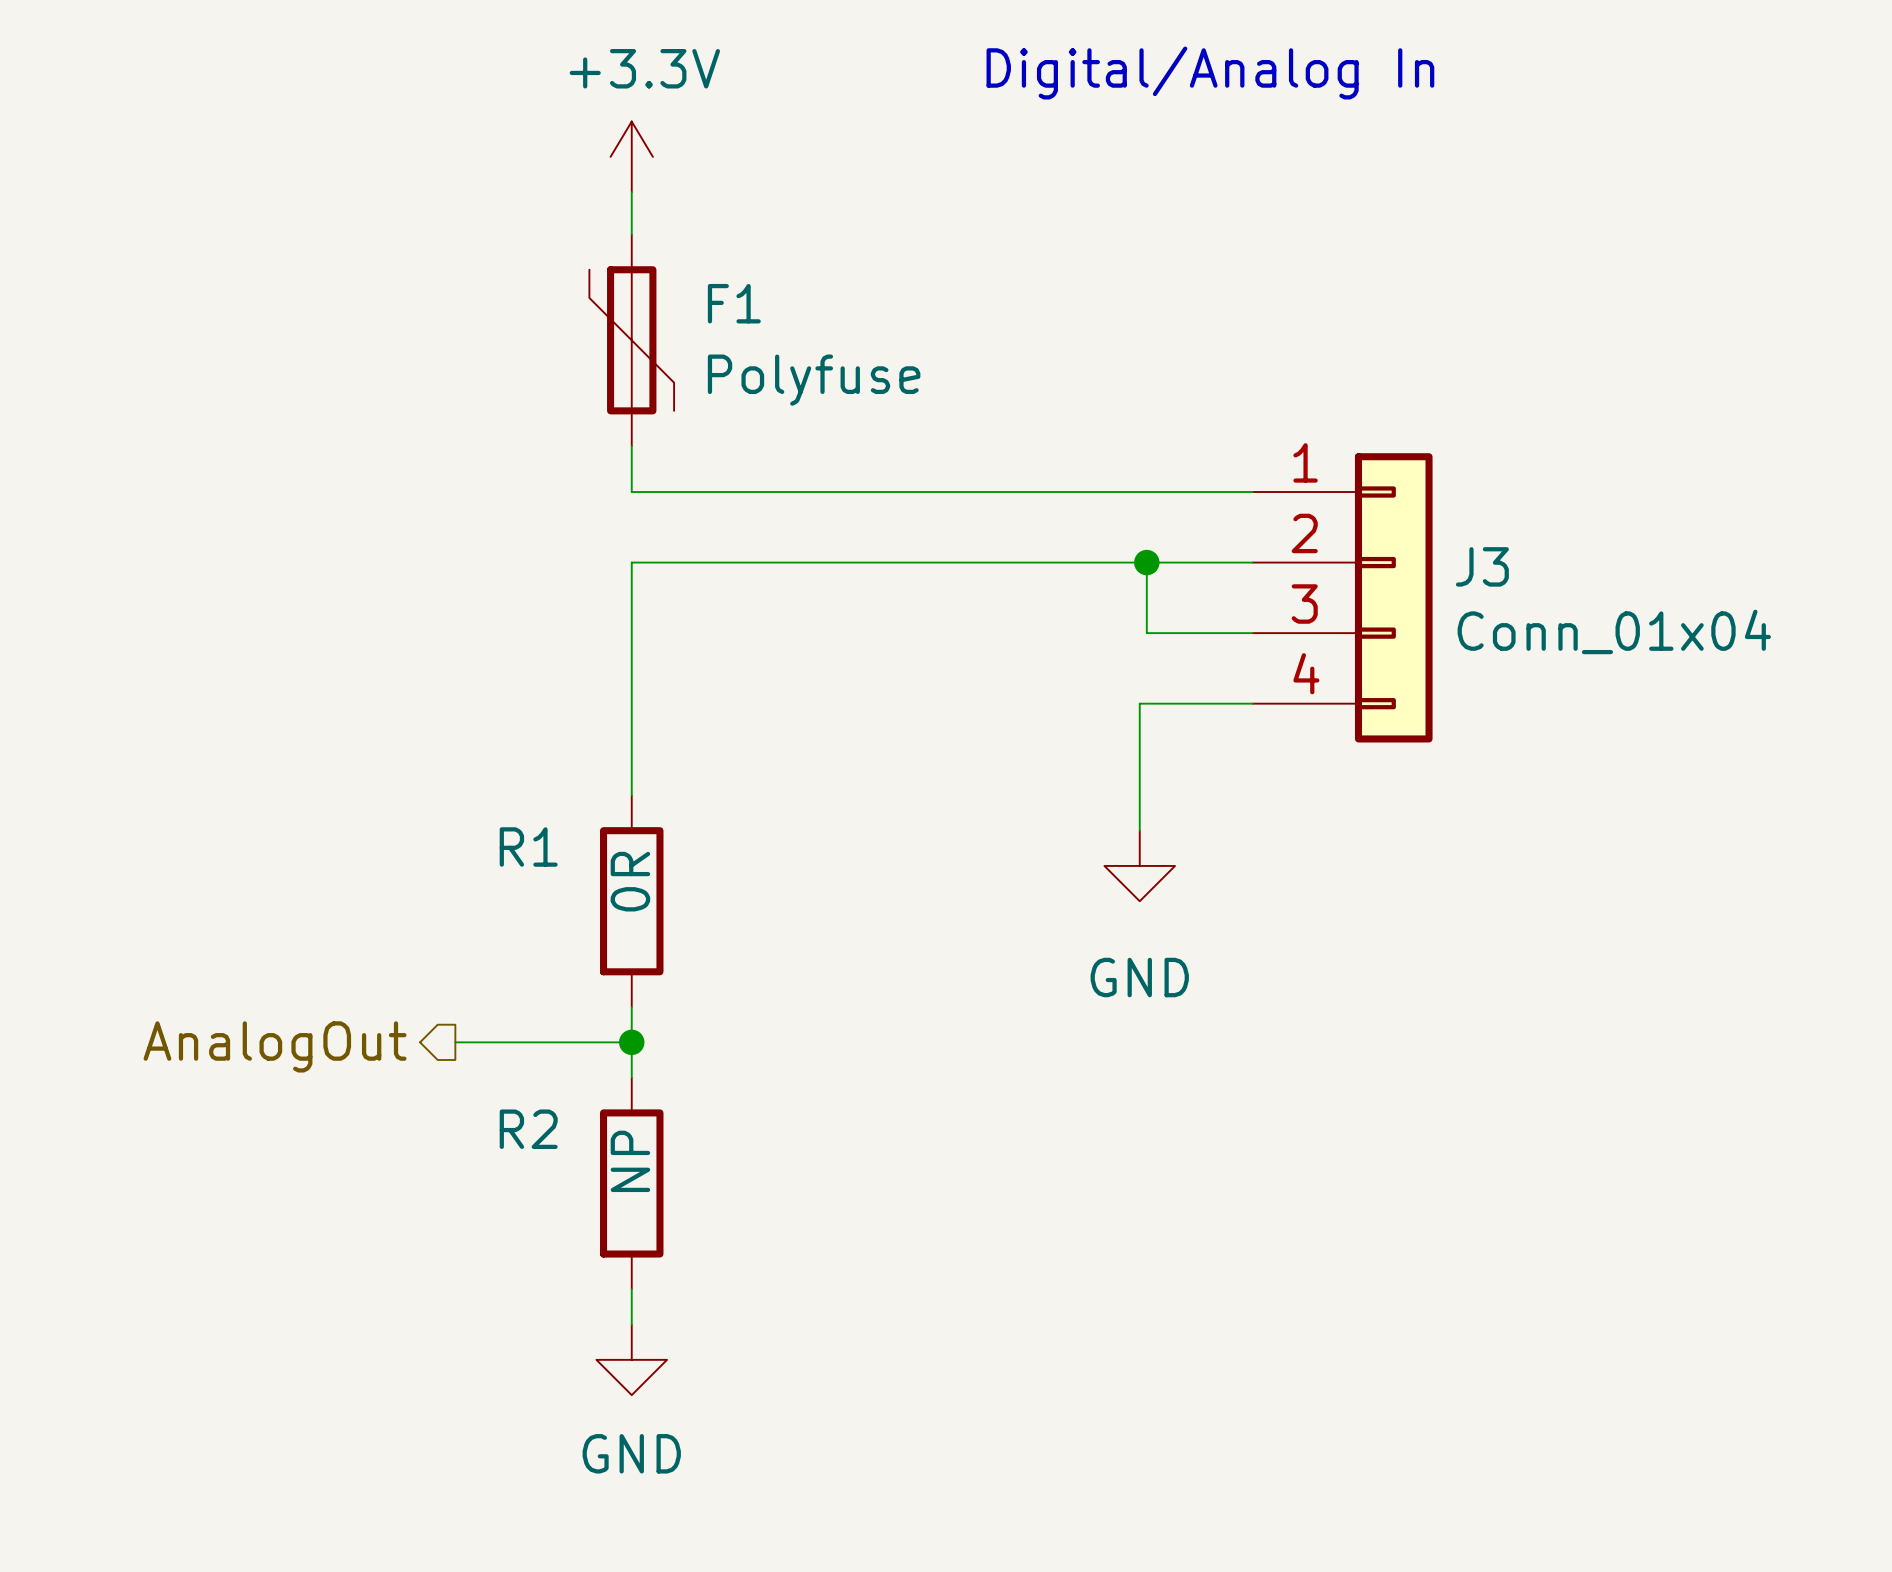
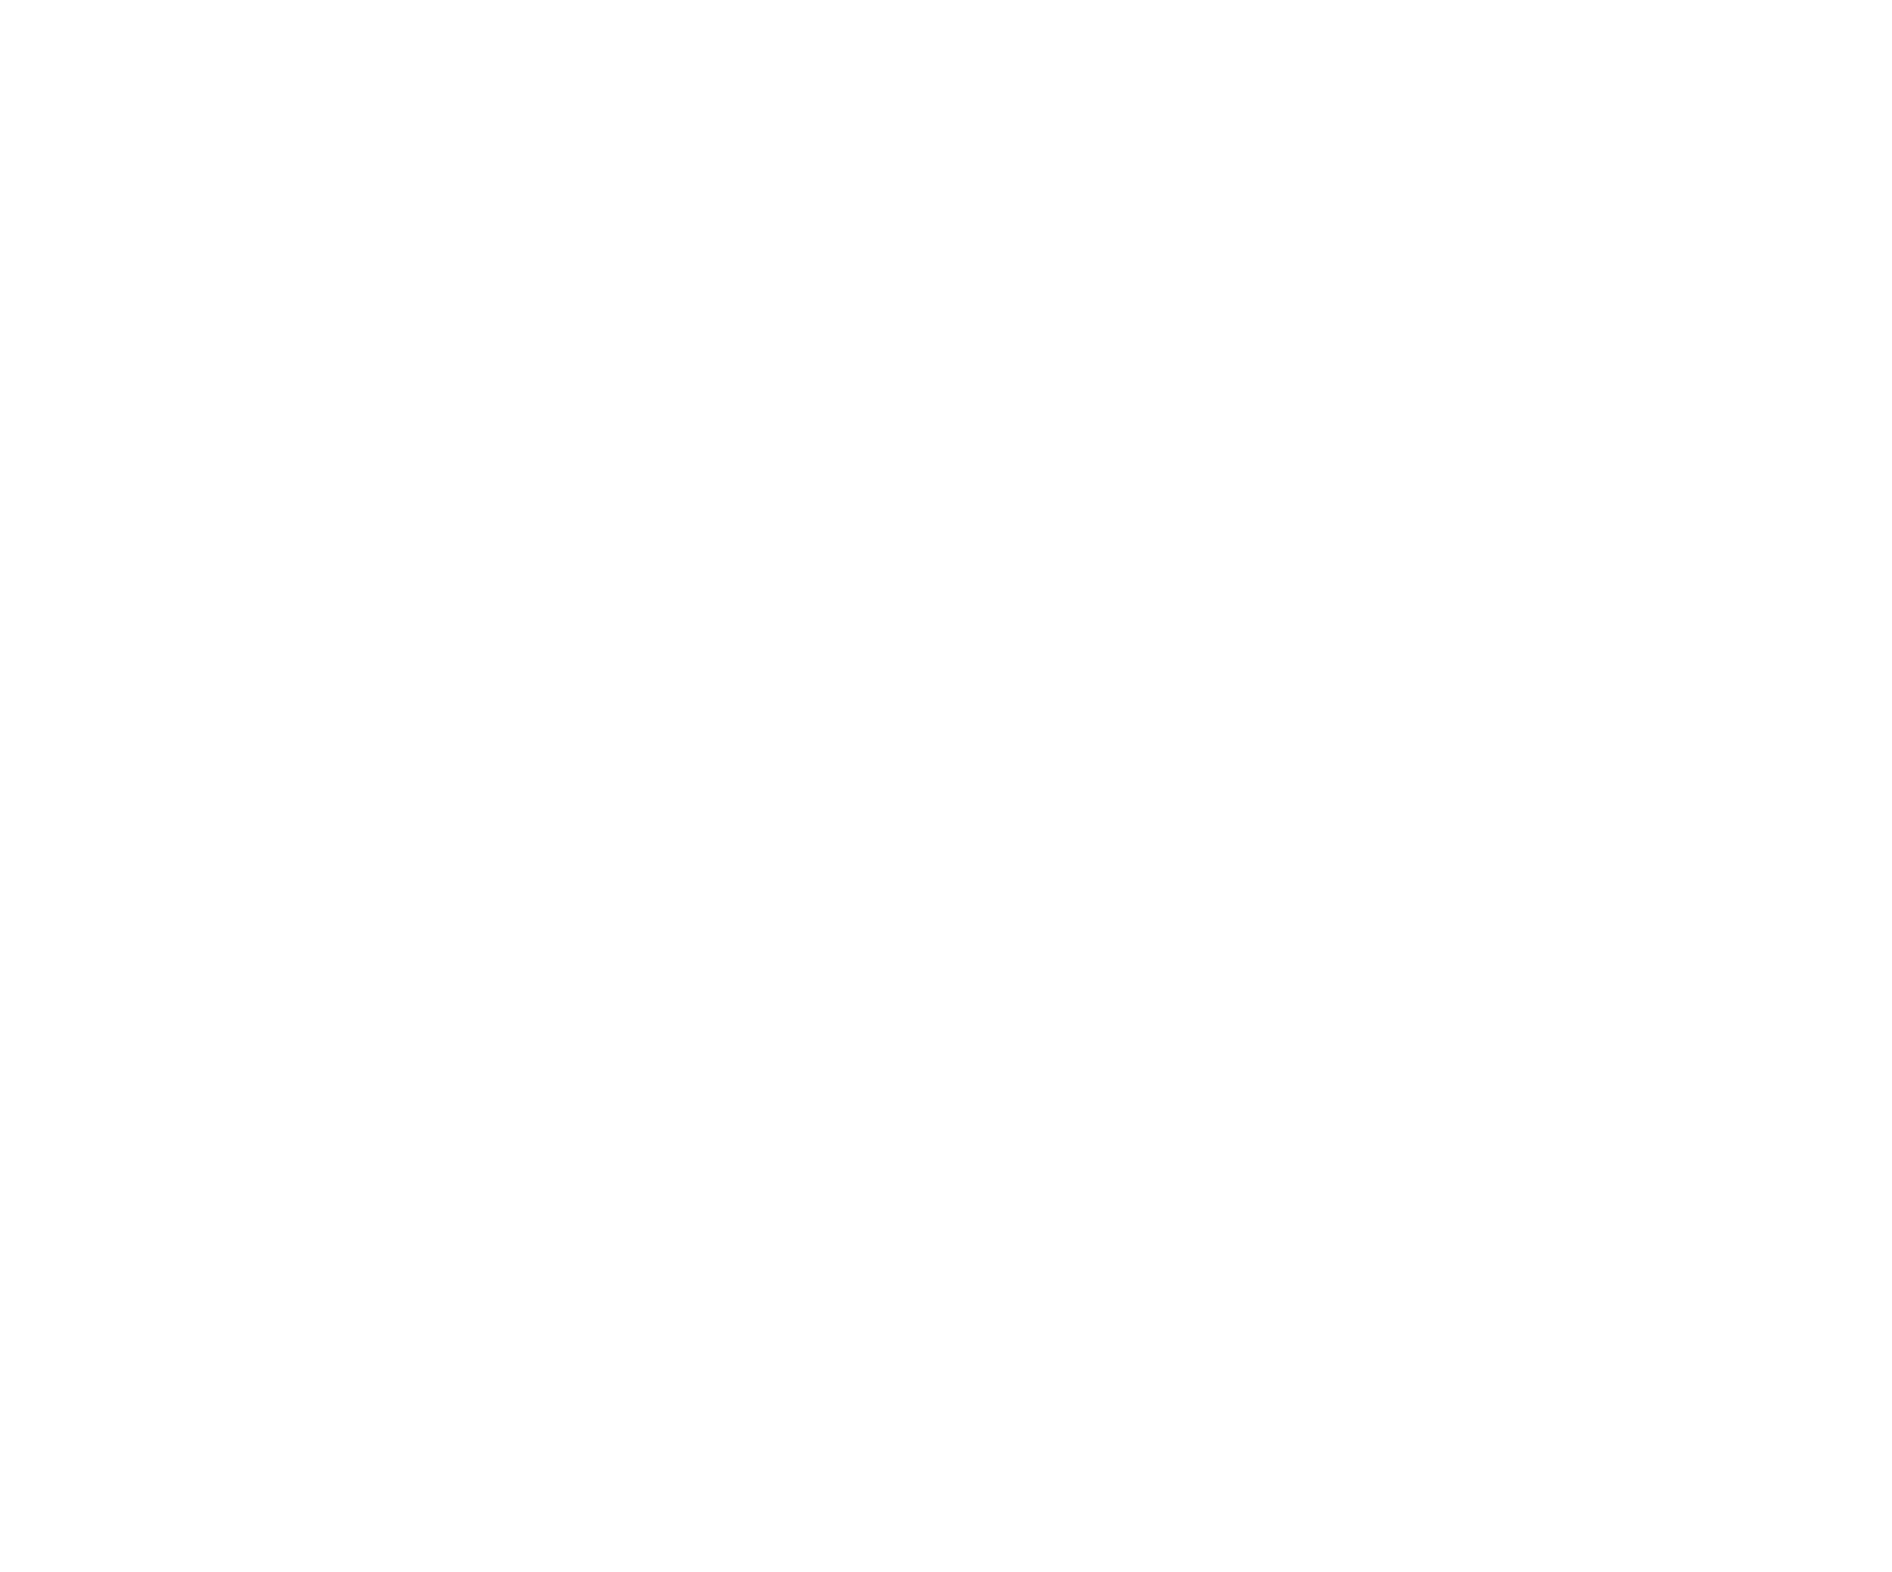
text: Digital/Analog In (1210, 73) -> none
power symbol: +3.3V (631, 156) -> none
wire: (631, 192) (631, 234) -> none
F1: Polyfuse (631, 340) -> none
wire: (631, 446) (631, 492) (1252, 492) -> none
wire: (1146, 562) (1146, 633) (1252, 633) -> none
junction: (1146, 562) -> none
wire: (1252, 562) (631, 562) (631, 795) -> none
J3: Conn_01x04 (1342, 597) -> none
wire: (1252, 703) (1139, 703) (1139, 830) -> none
power symbol: GND (1139, 865) -> none
R1: 0R (631, 901) -> none
wire: (631, 1007) (631, 1077) -> none
wire: (455, 1042) (631, 1042) -> none
junction: (631, 1042) -> none
hierarchical label: AnalogOut (275, 1046) -> none
R2: NP (631, 1183) -> none
wire: (631, 1289) (631, 1324) -> none
power symbol: GND (631, 1359) -> none

